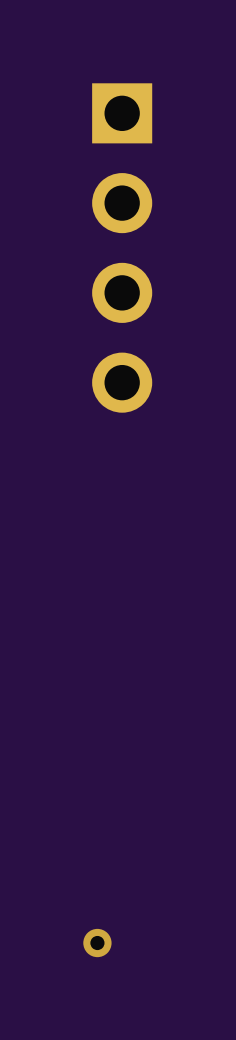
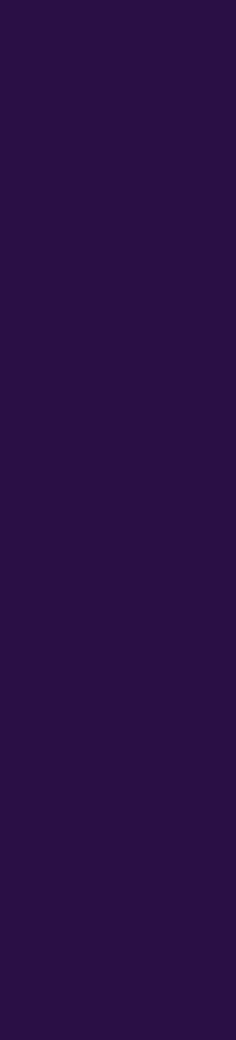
part: (122, 247) -> none
via: (97, 943) -> none

